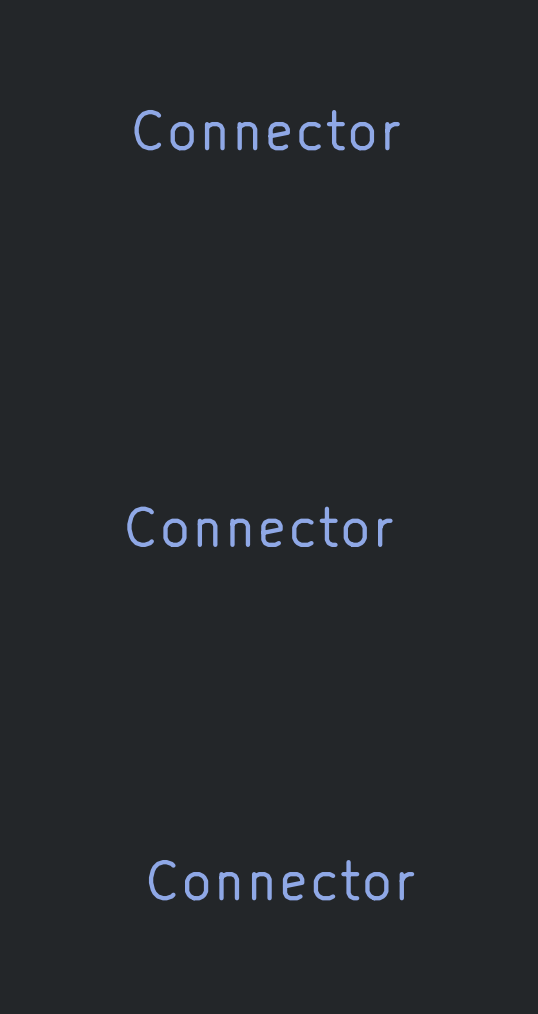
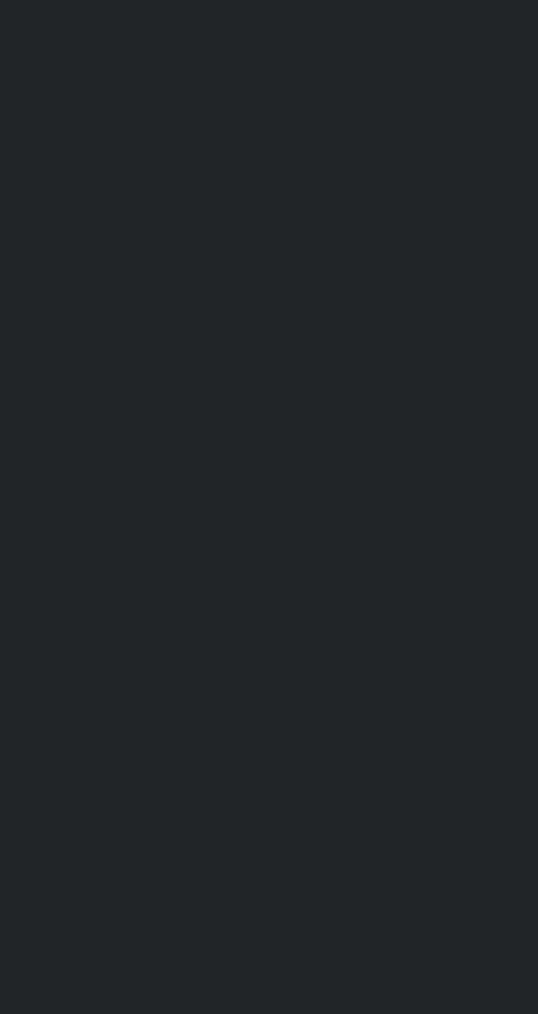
text: Connector (267, 130) -> none
text: Connector (259, 526) -> none
text: Connector (281, 880) -> none

